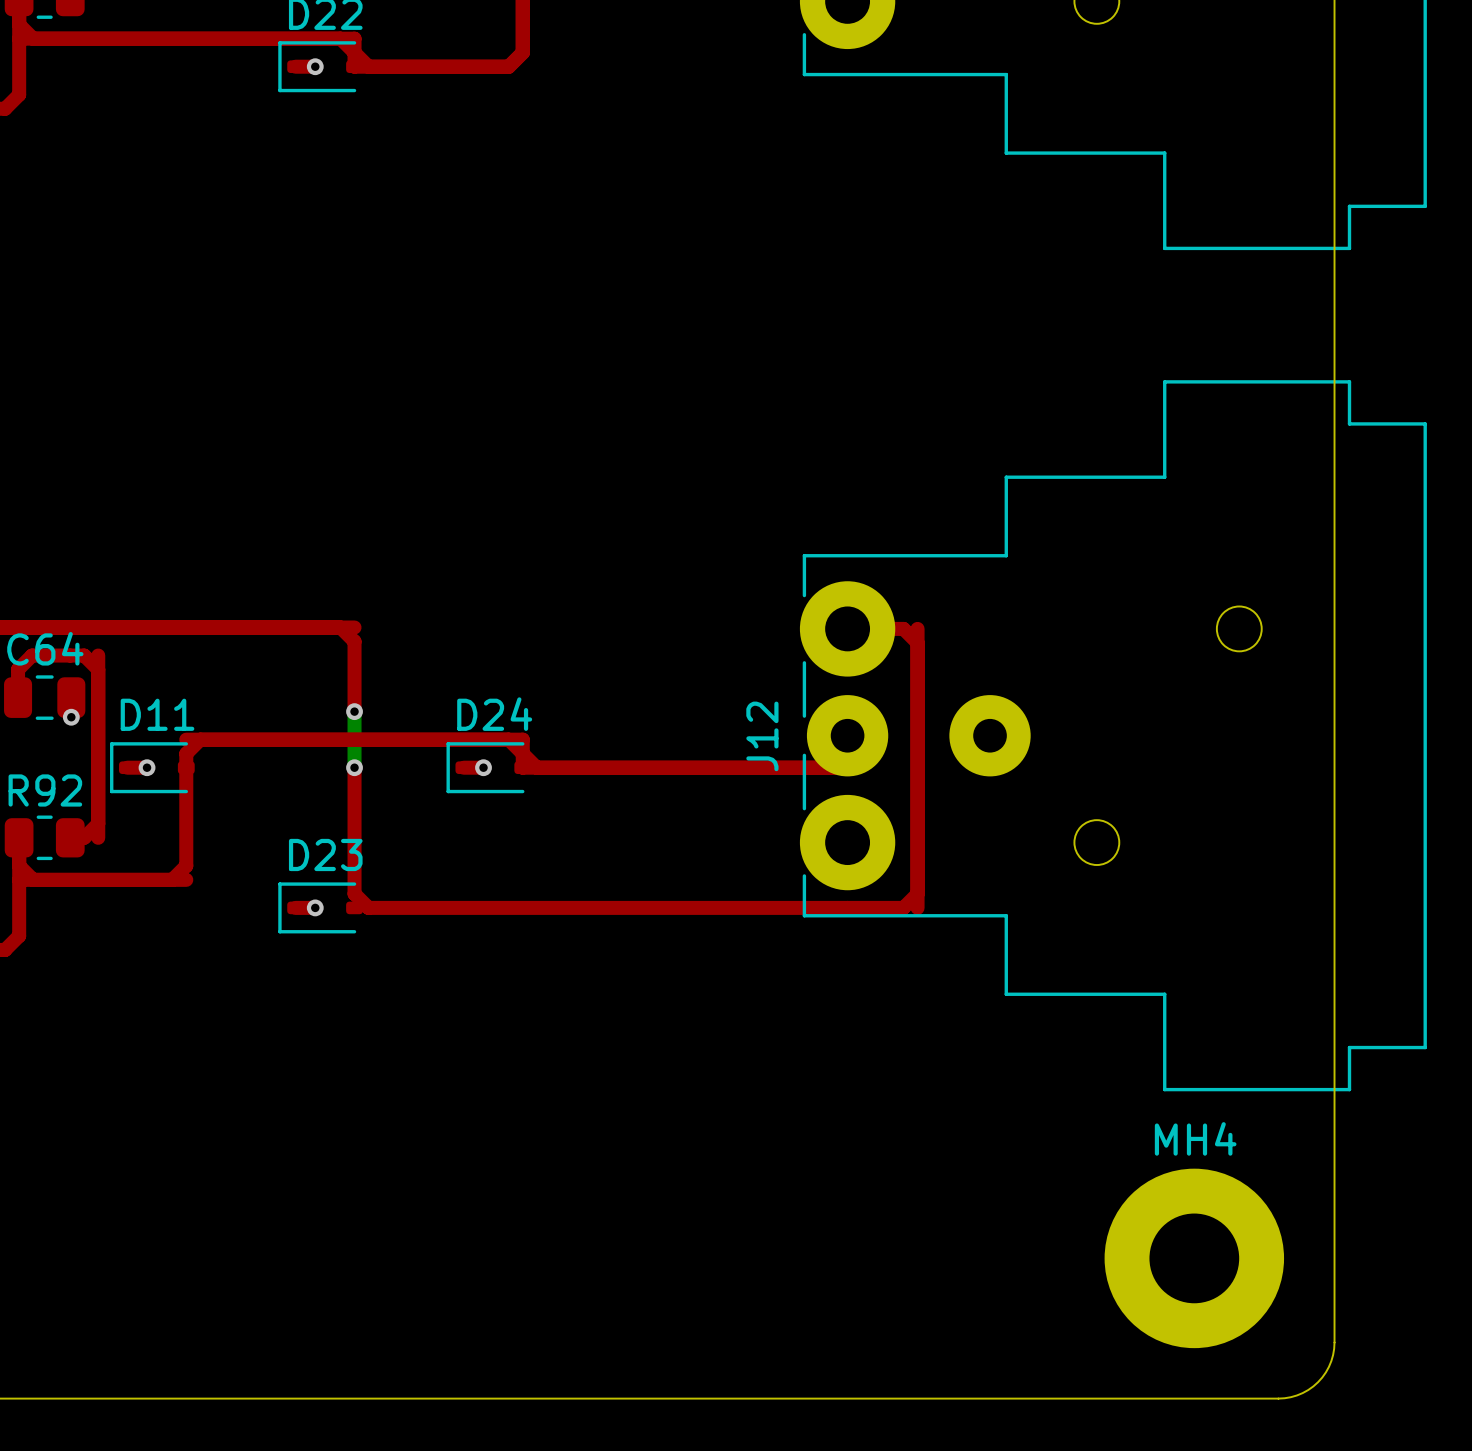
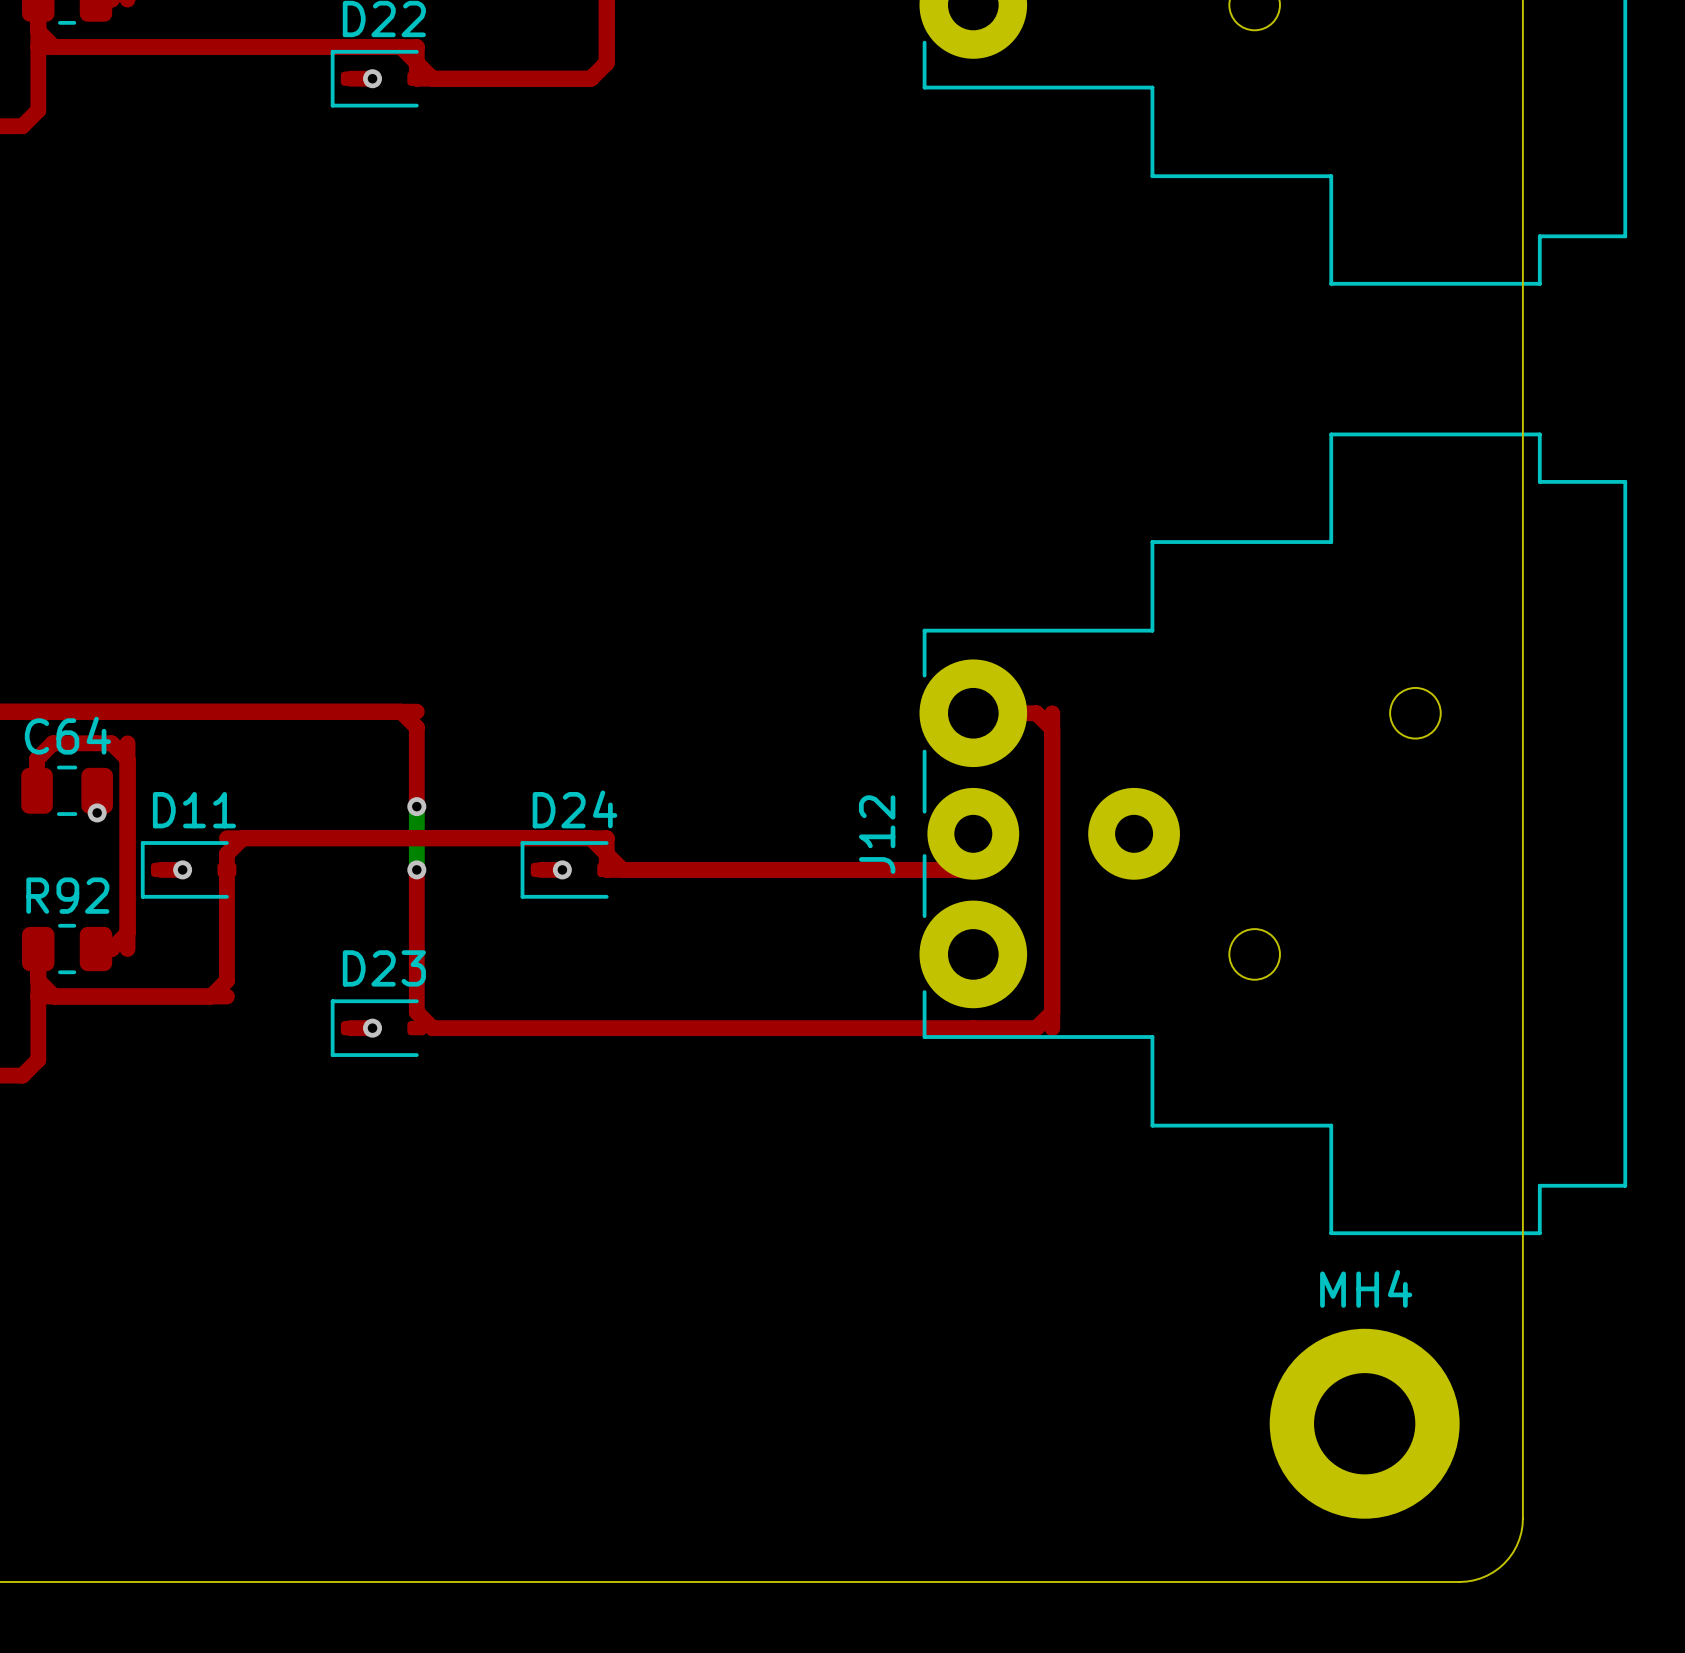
MH4 footprint: [1104, 1168, 1285, 1349] -> [1269, 1328, 1460, 1519]

